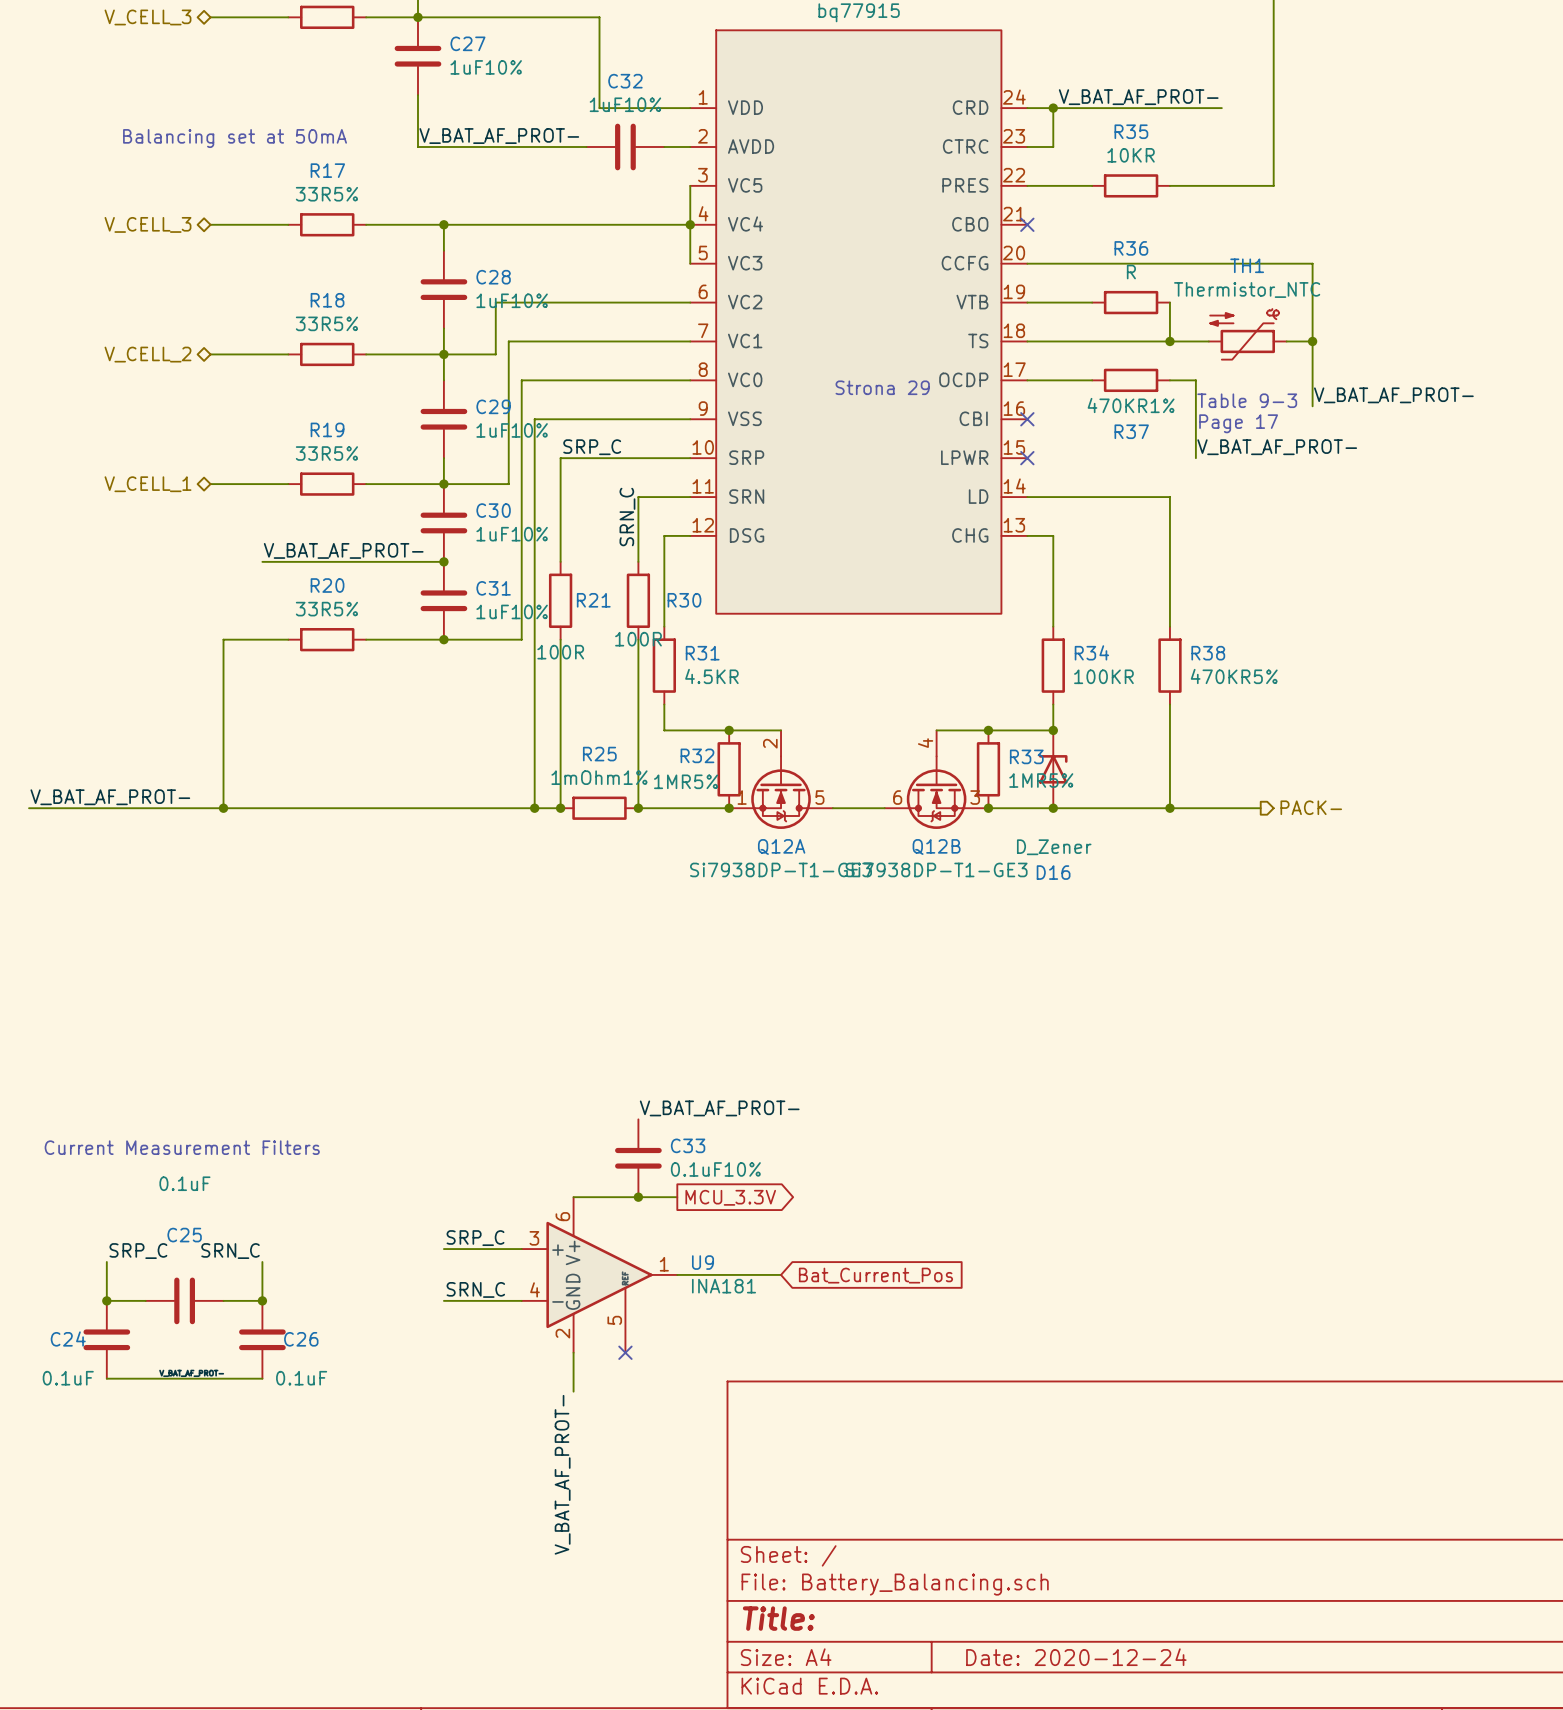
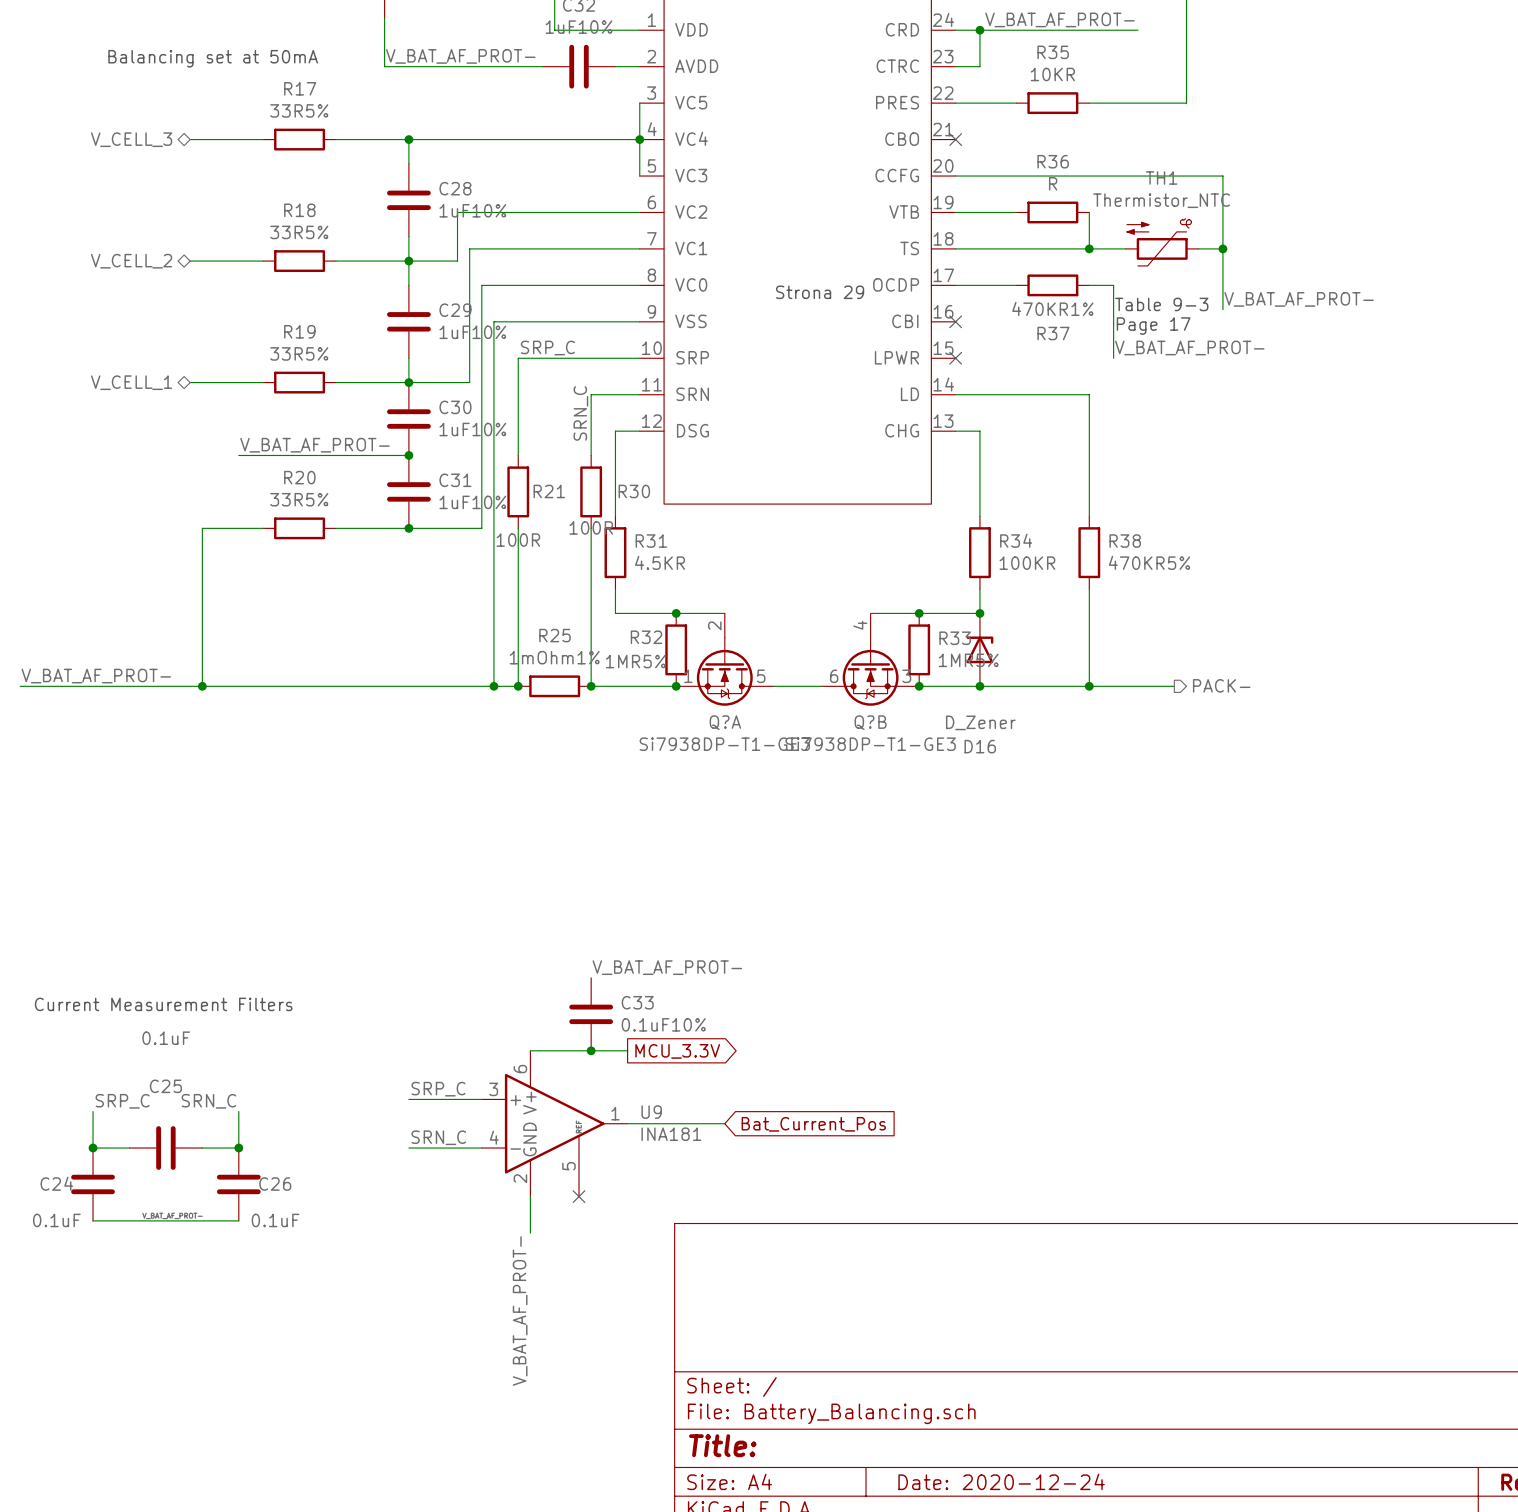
Q12A name: Q12A (781, 846) -> Q?A (725, 722)
Q12B name: Q12B (936, 846) -> Q?B (870, 722)

